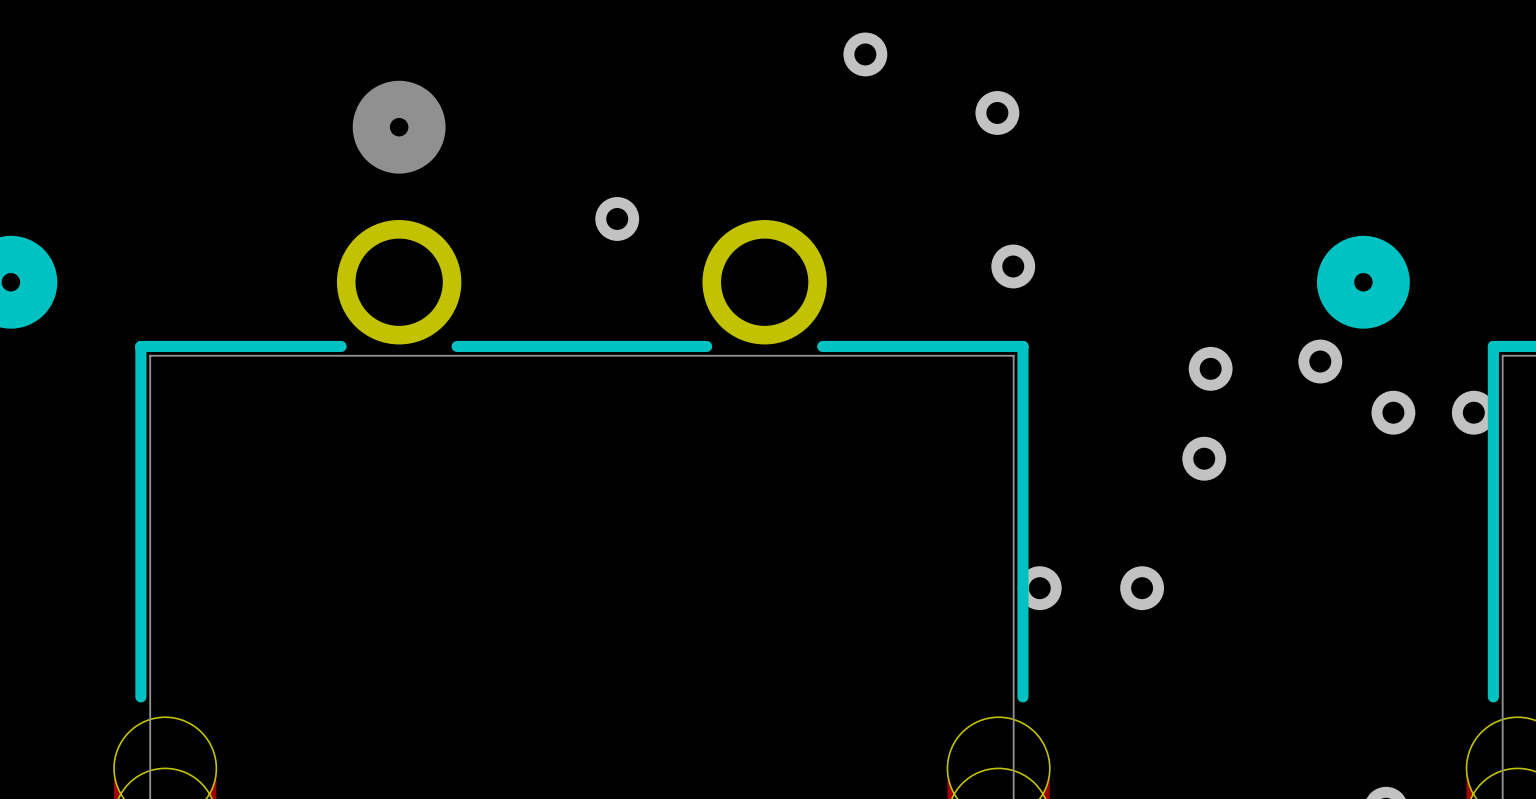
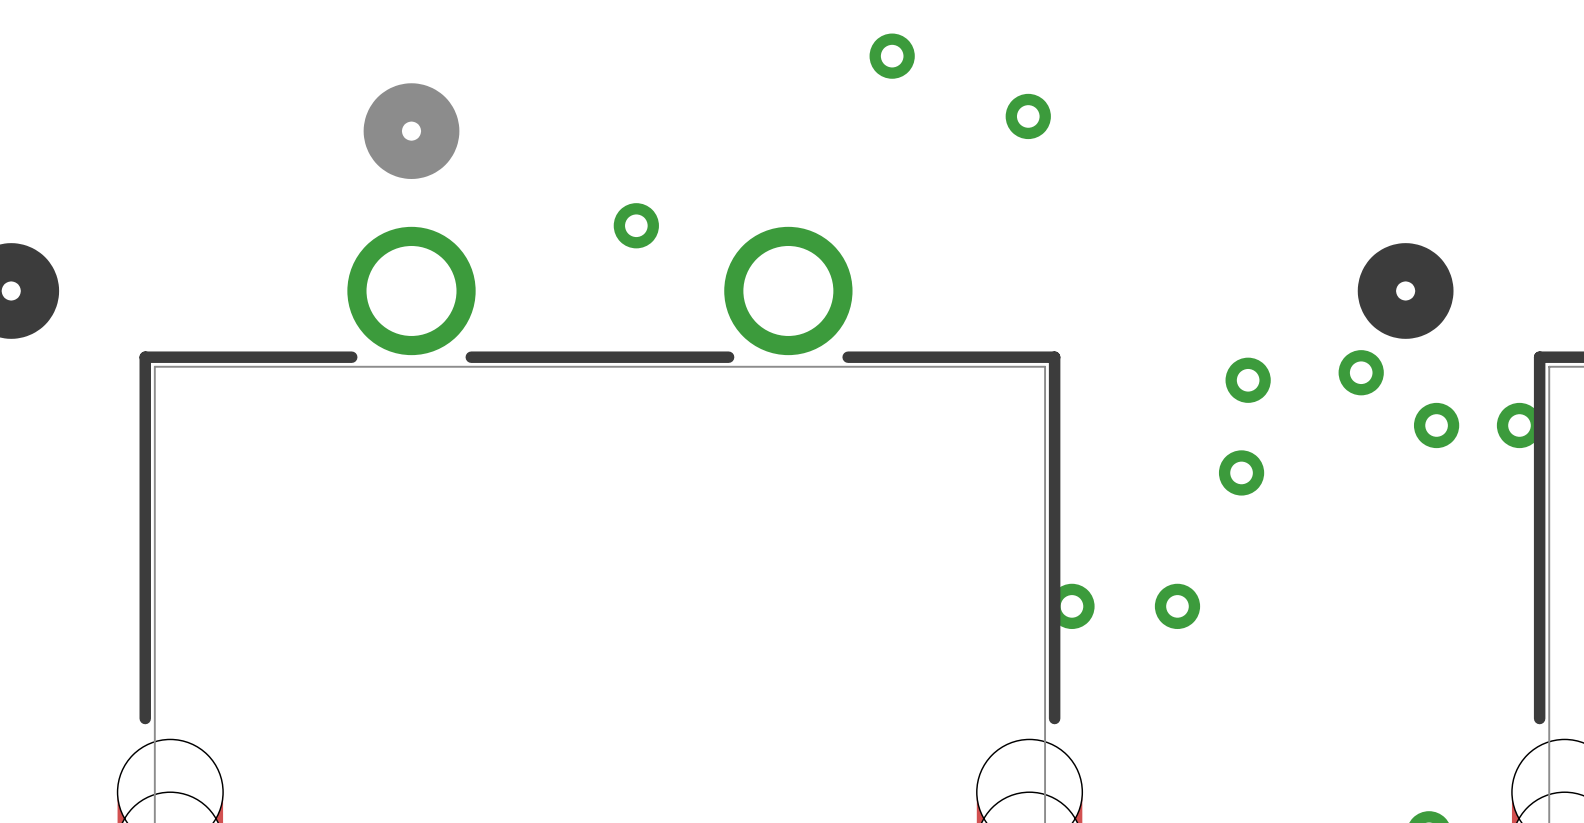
via: (1013, 266) -> none

